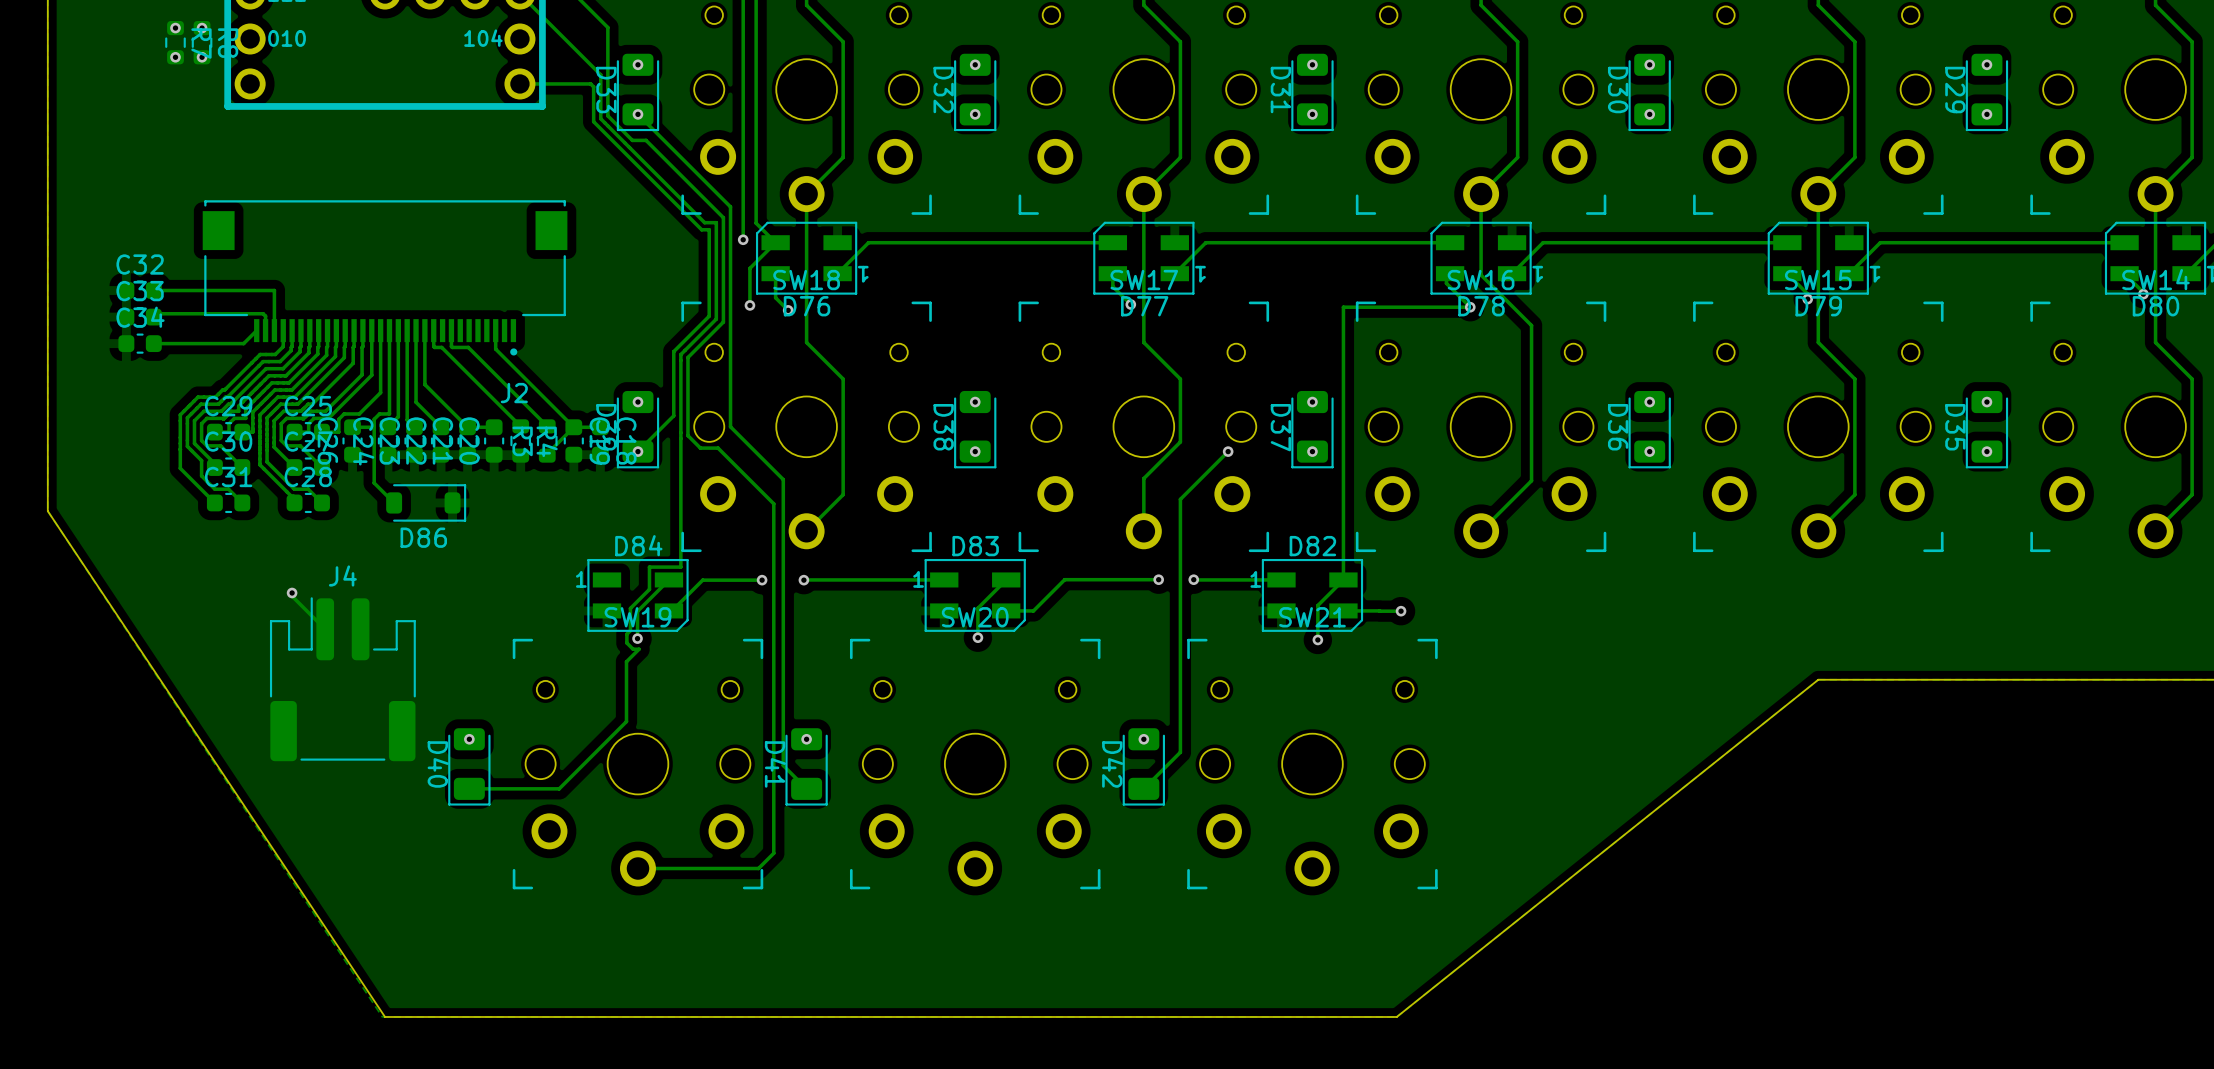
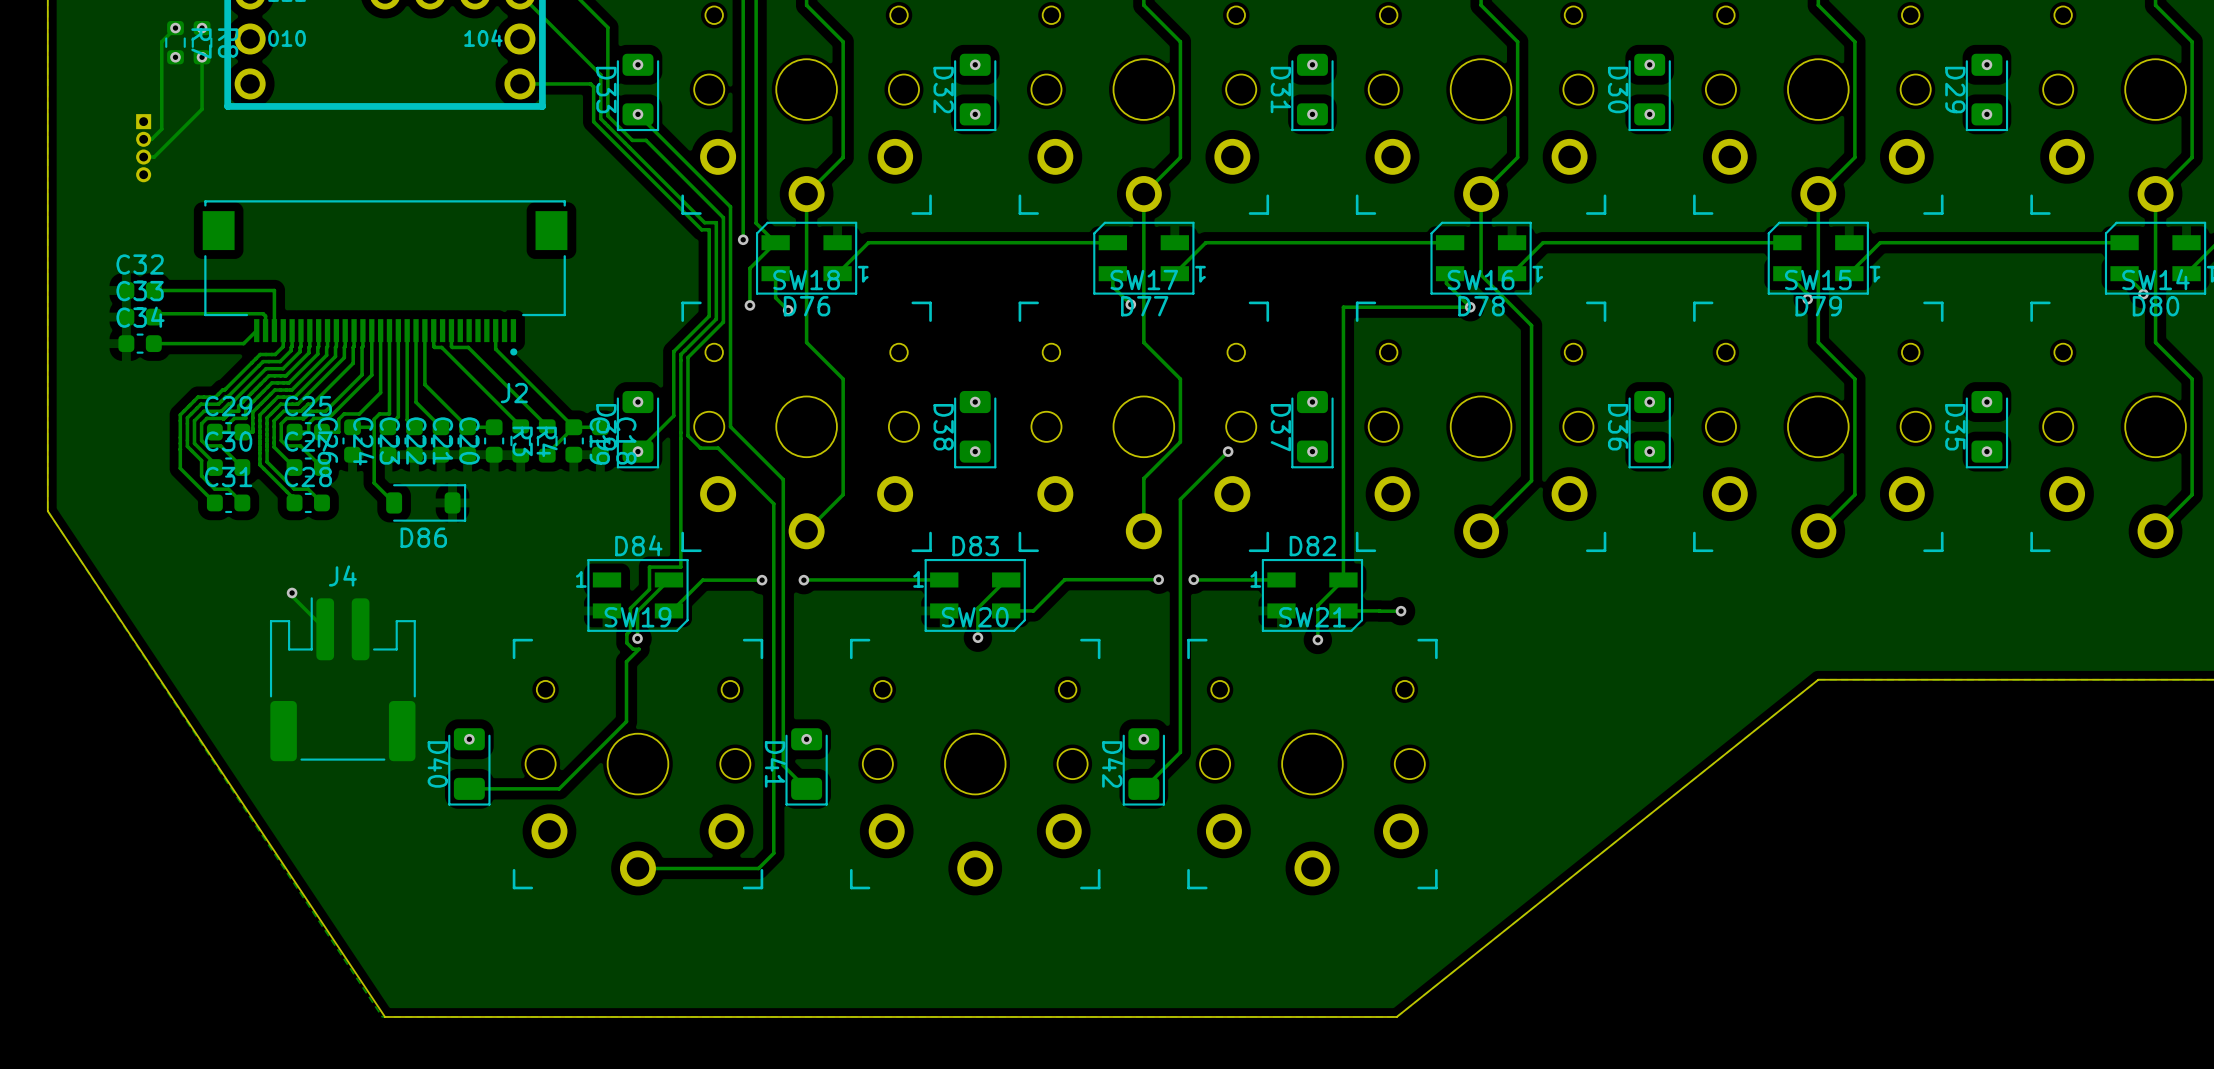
track: none -> (175, 28) (161, 41) (161, 129) (151, 139) (143, 139)
track: none -> (202, 57) (202, 109) (154, 157) (143, 157)
part: none -> (143, 148)

